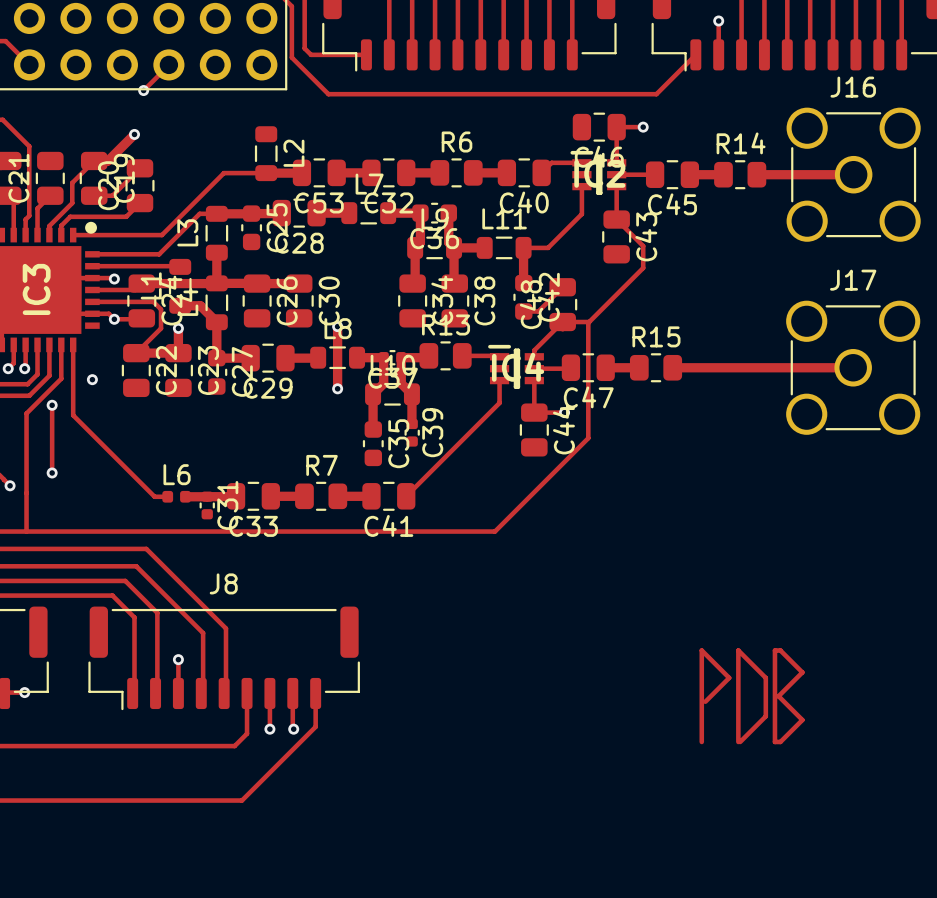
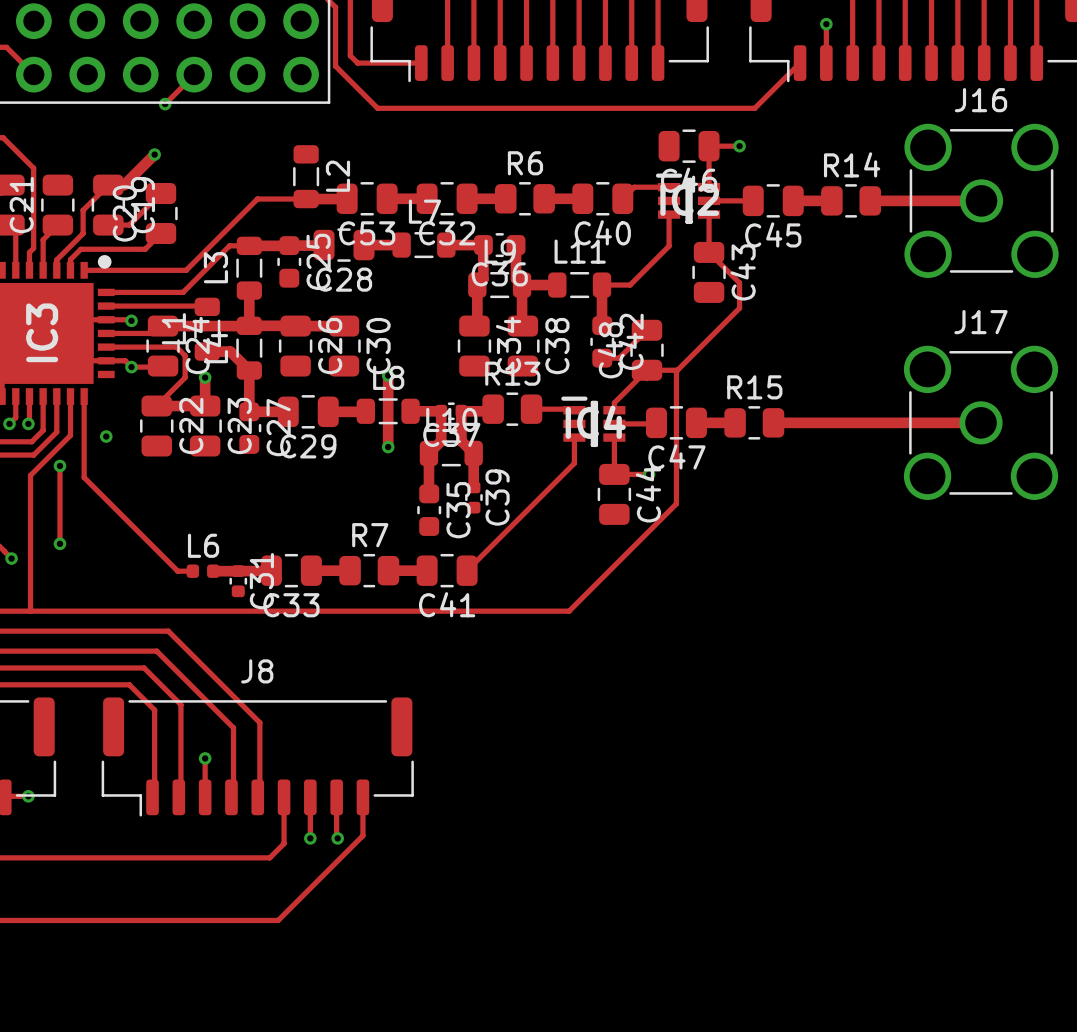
track: (774, 650) (774, 741) (780, 741) (802, 720) (778, 696) (802, 672) (780, 650) (774, 650) -> none
track: (705, 701) (729, 677) (701, 650) (701, 741) -> none
track: (738, 741) (738, 650) (765, 677) (765, 716) (740, 741) -> none

